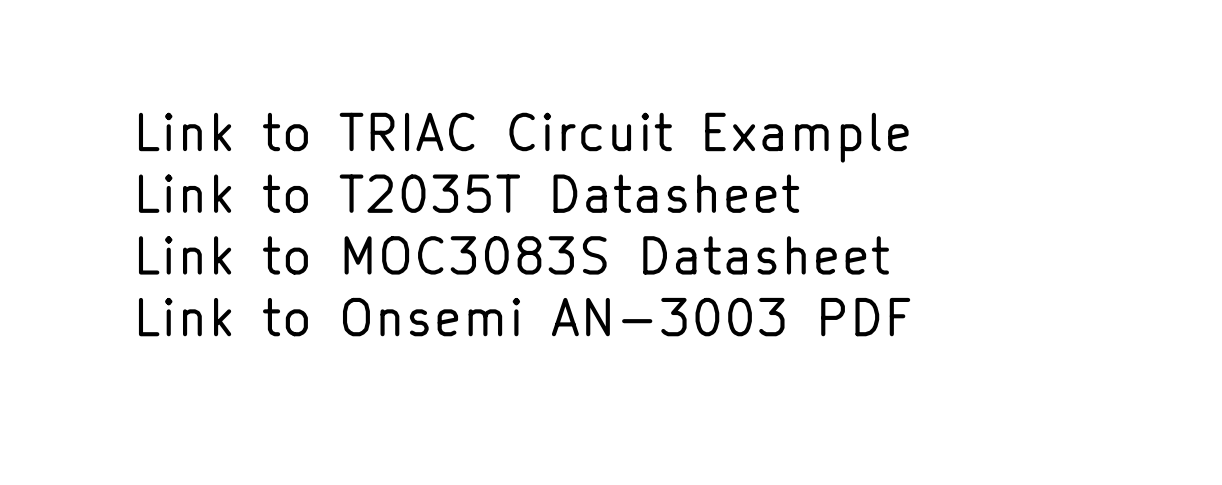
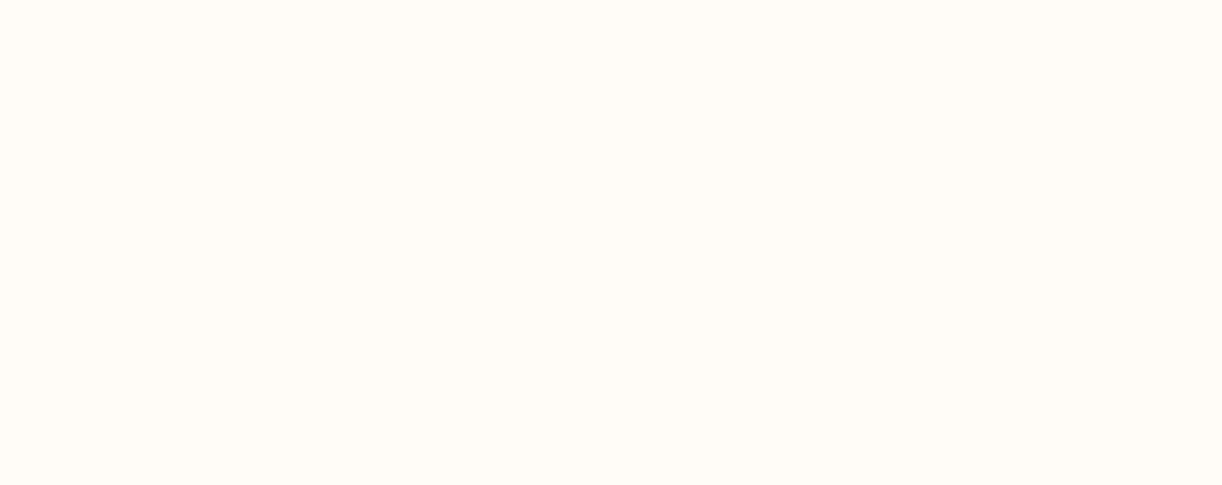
text: Link to TRIAC Circuit Example (523, 137) -> none
text: Link to T2035T Datasheet (469, 193) -> none
text: Link to MOC3083S Datasheet (513, 255) -> none
text: Link to Onsemi AN-3003 PDF (524, 317) -> none

